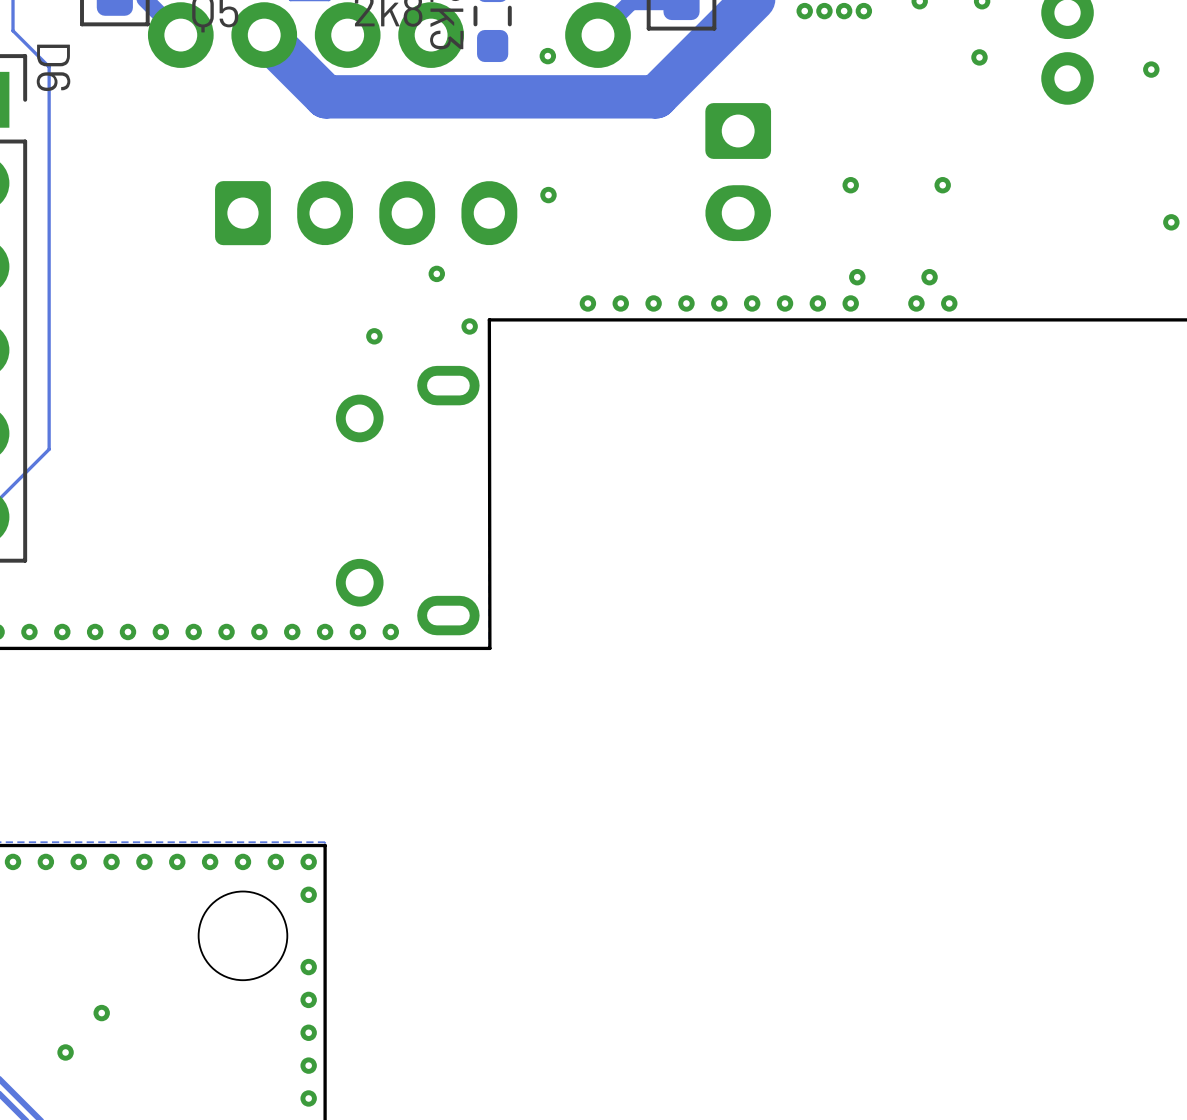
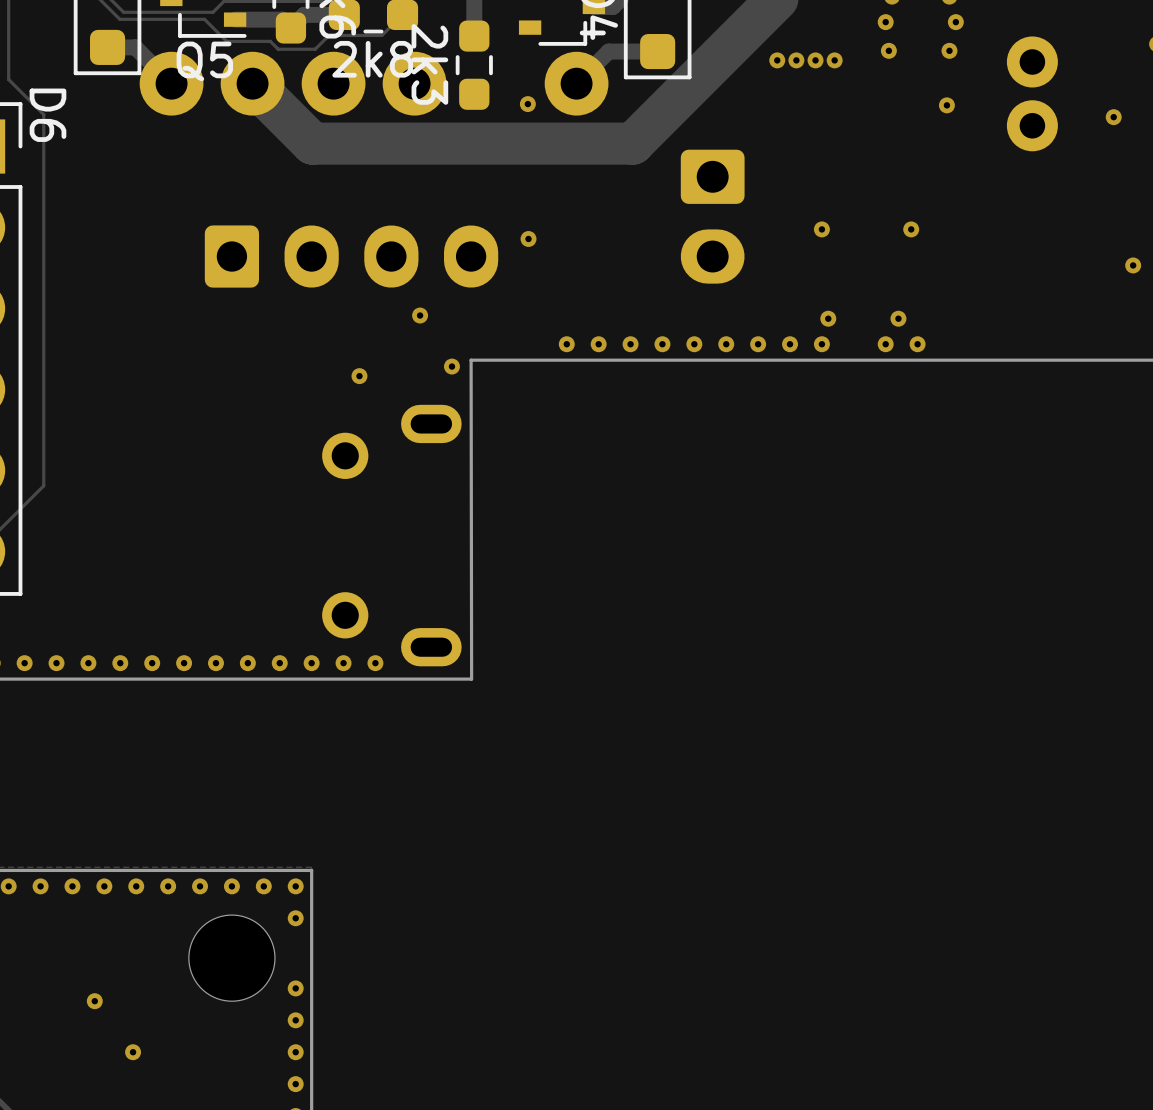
via: none -> (94, 1001)
via: (101, 1013) -> none
via: none -> (133, 1052)
via: (65, 1052) -> none

